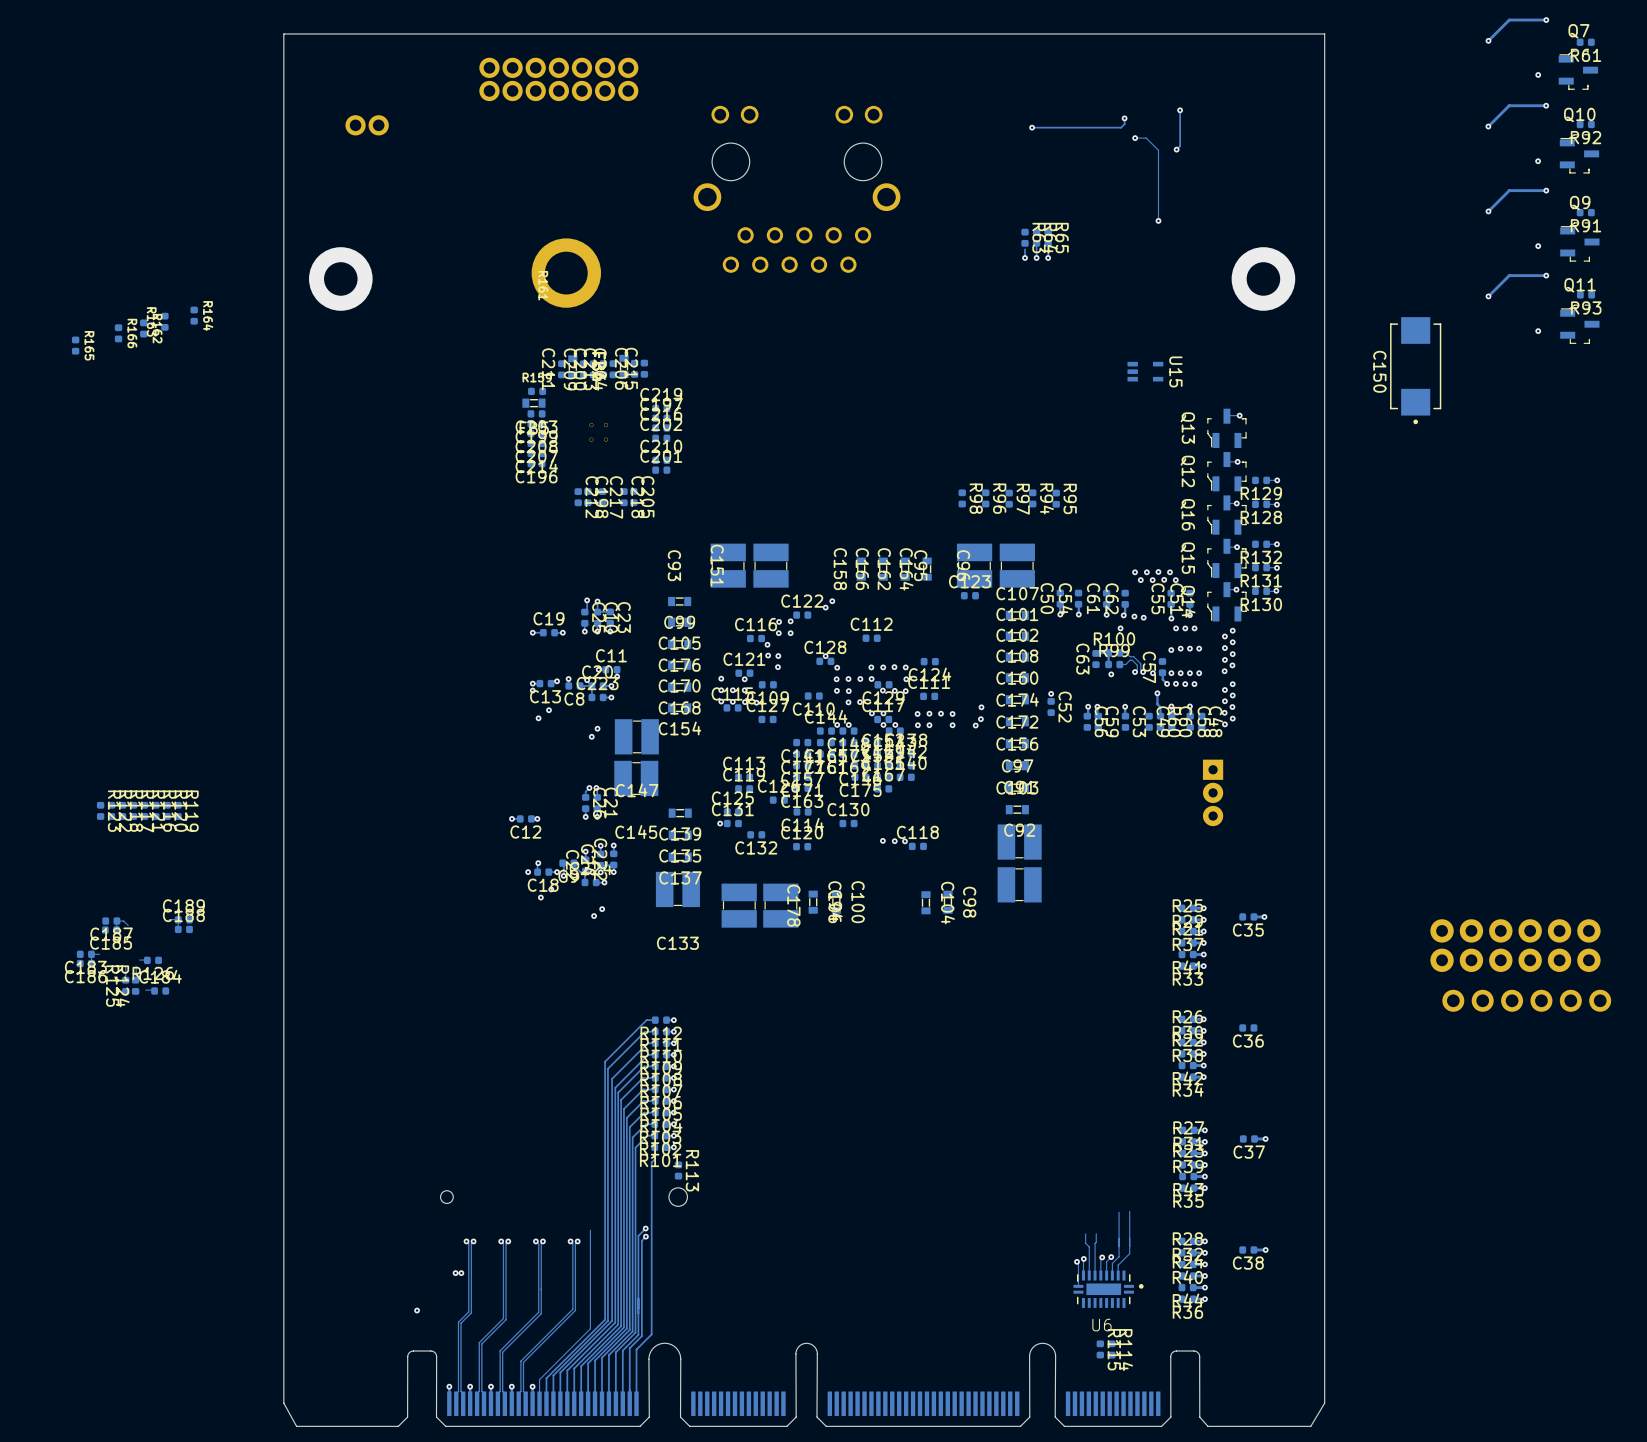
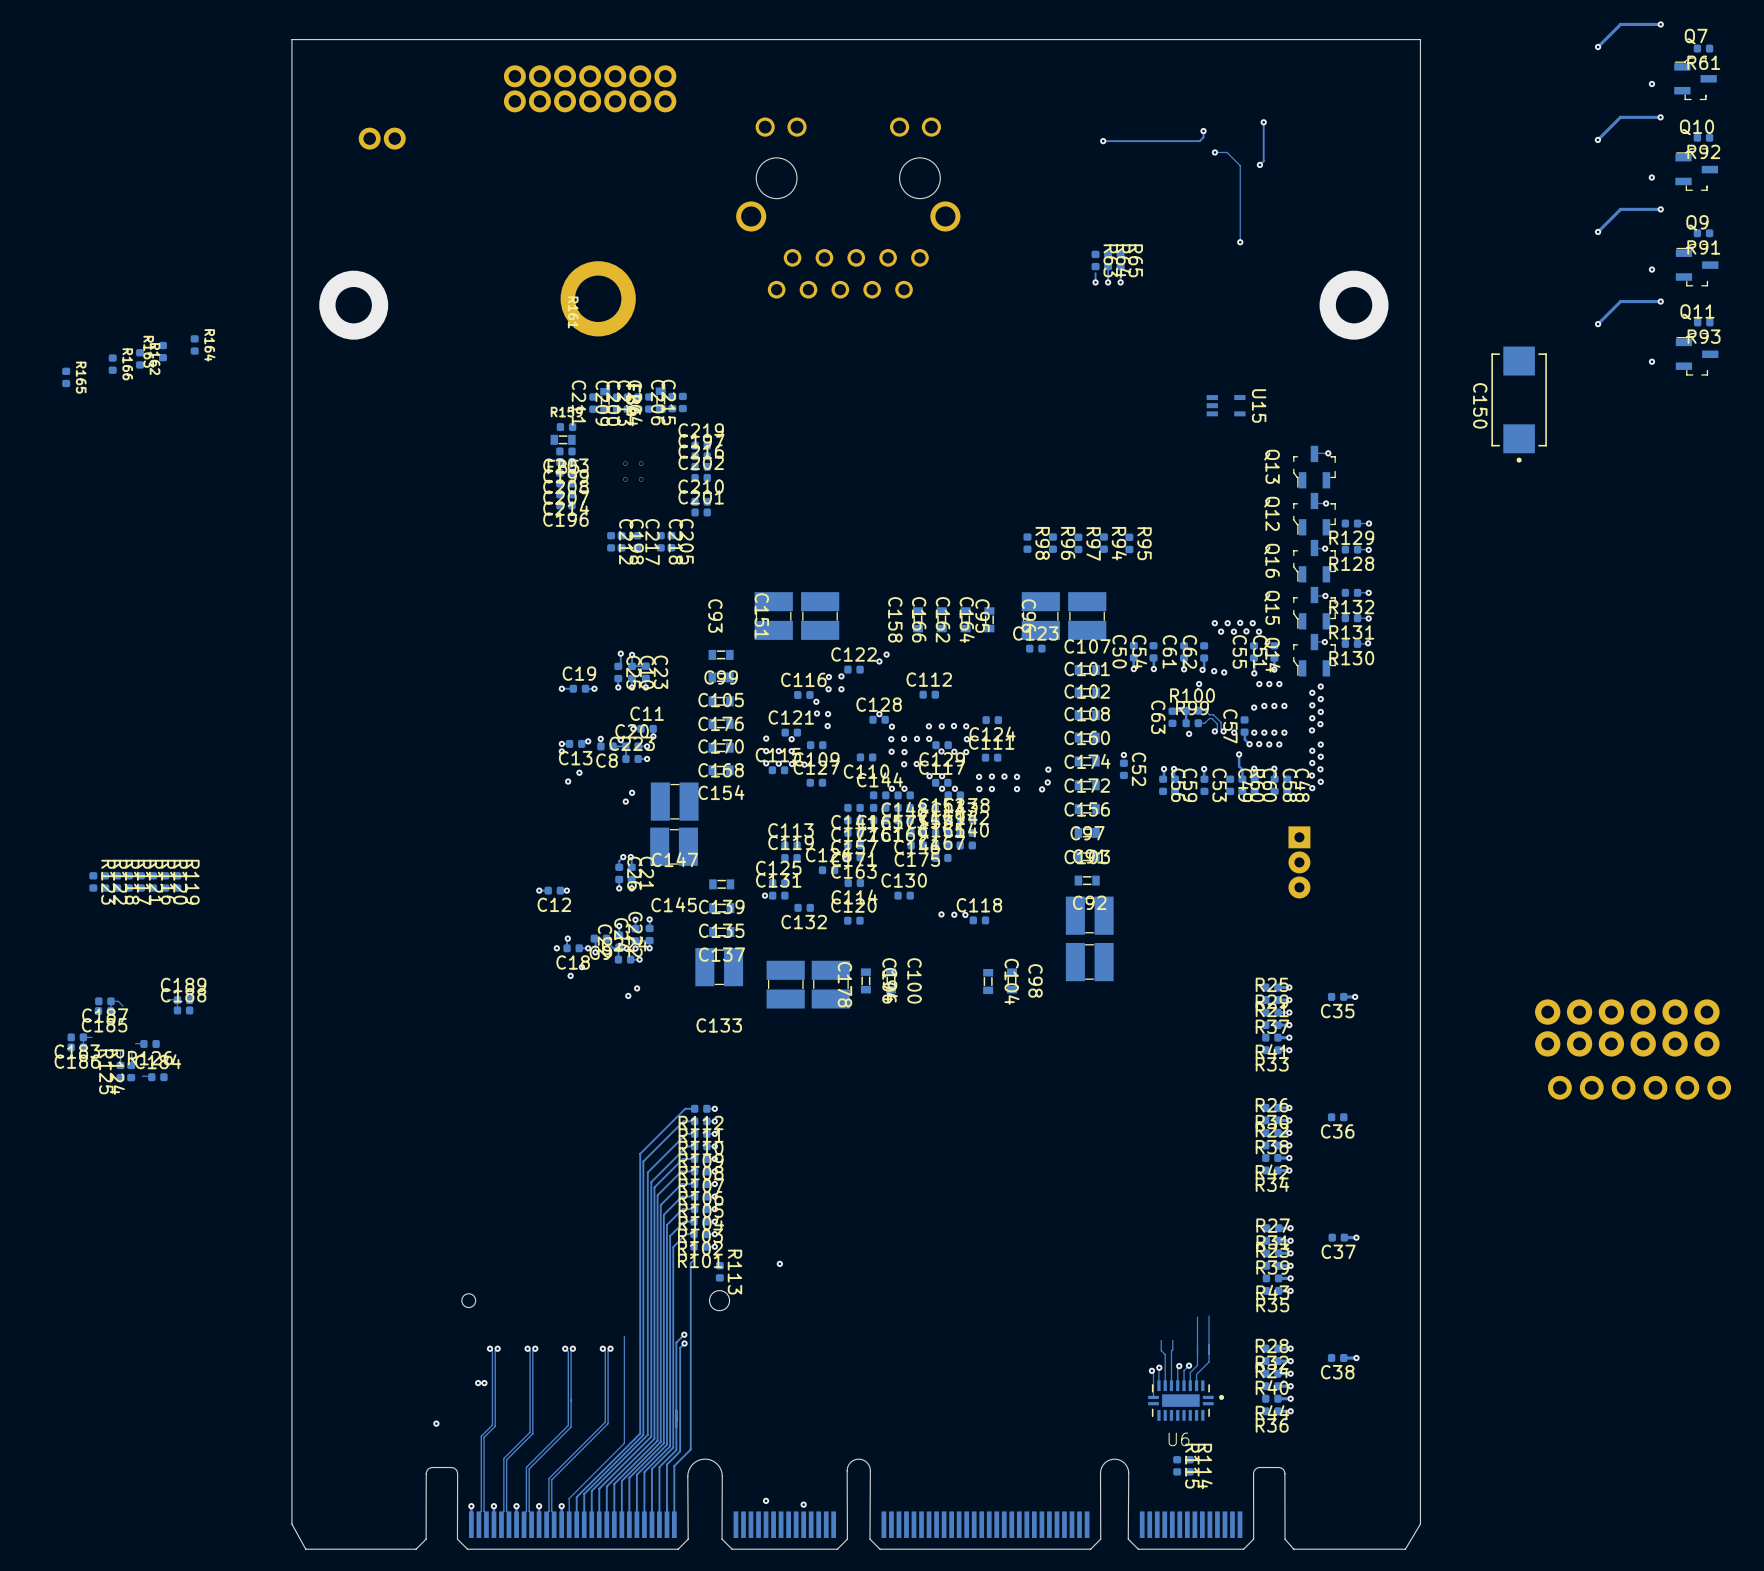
via: none -> (779, 1263)
via: none -> (766, 1500)
via: none -> (803, 1504)

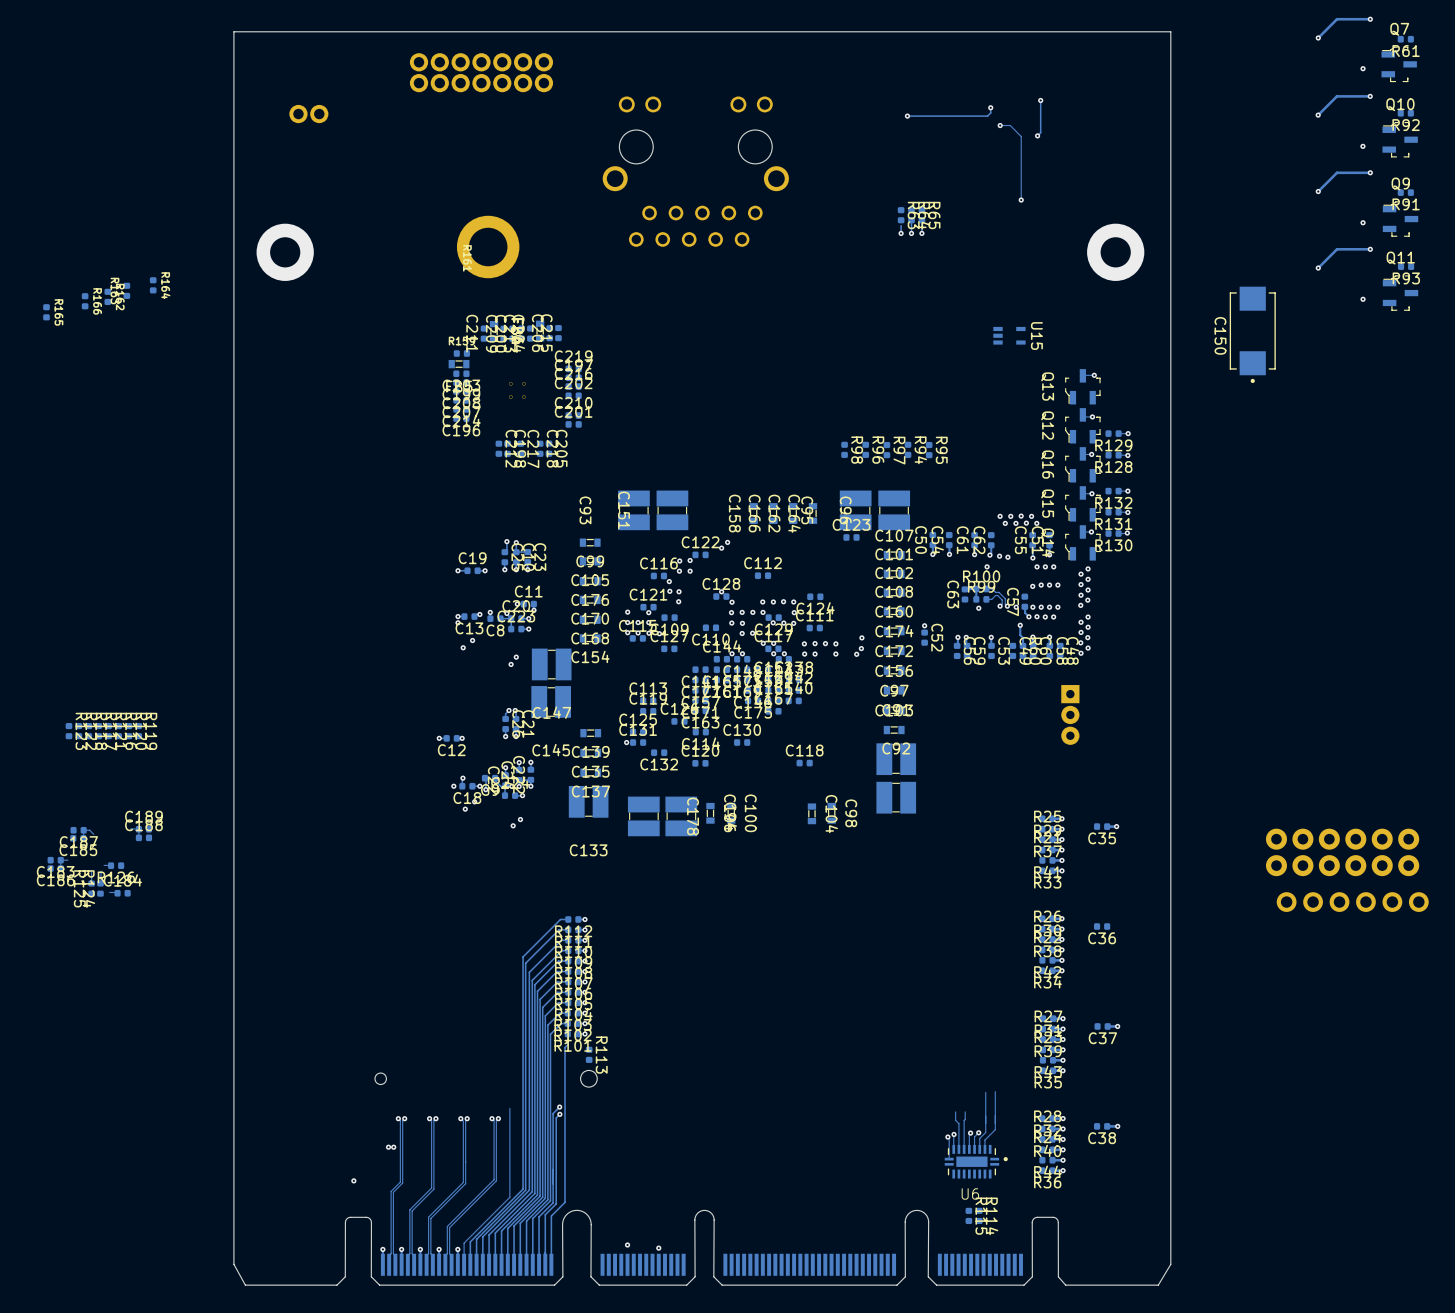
via: (941, 914) -> none
via: (954, 914) -> none
via: (965, 914) -> none
via: (779, 1263) -> none

